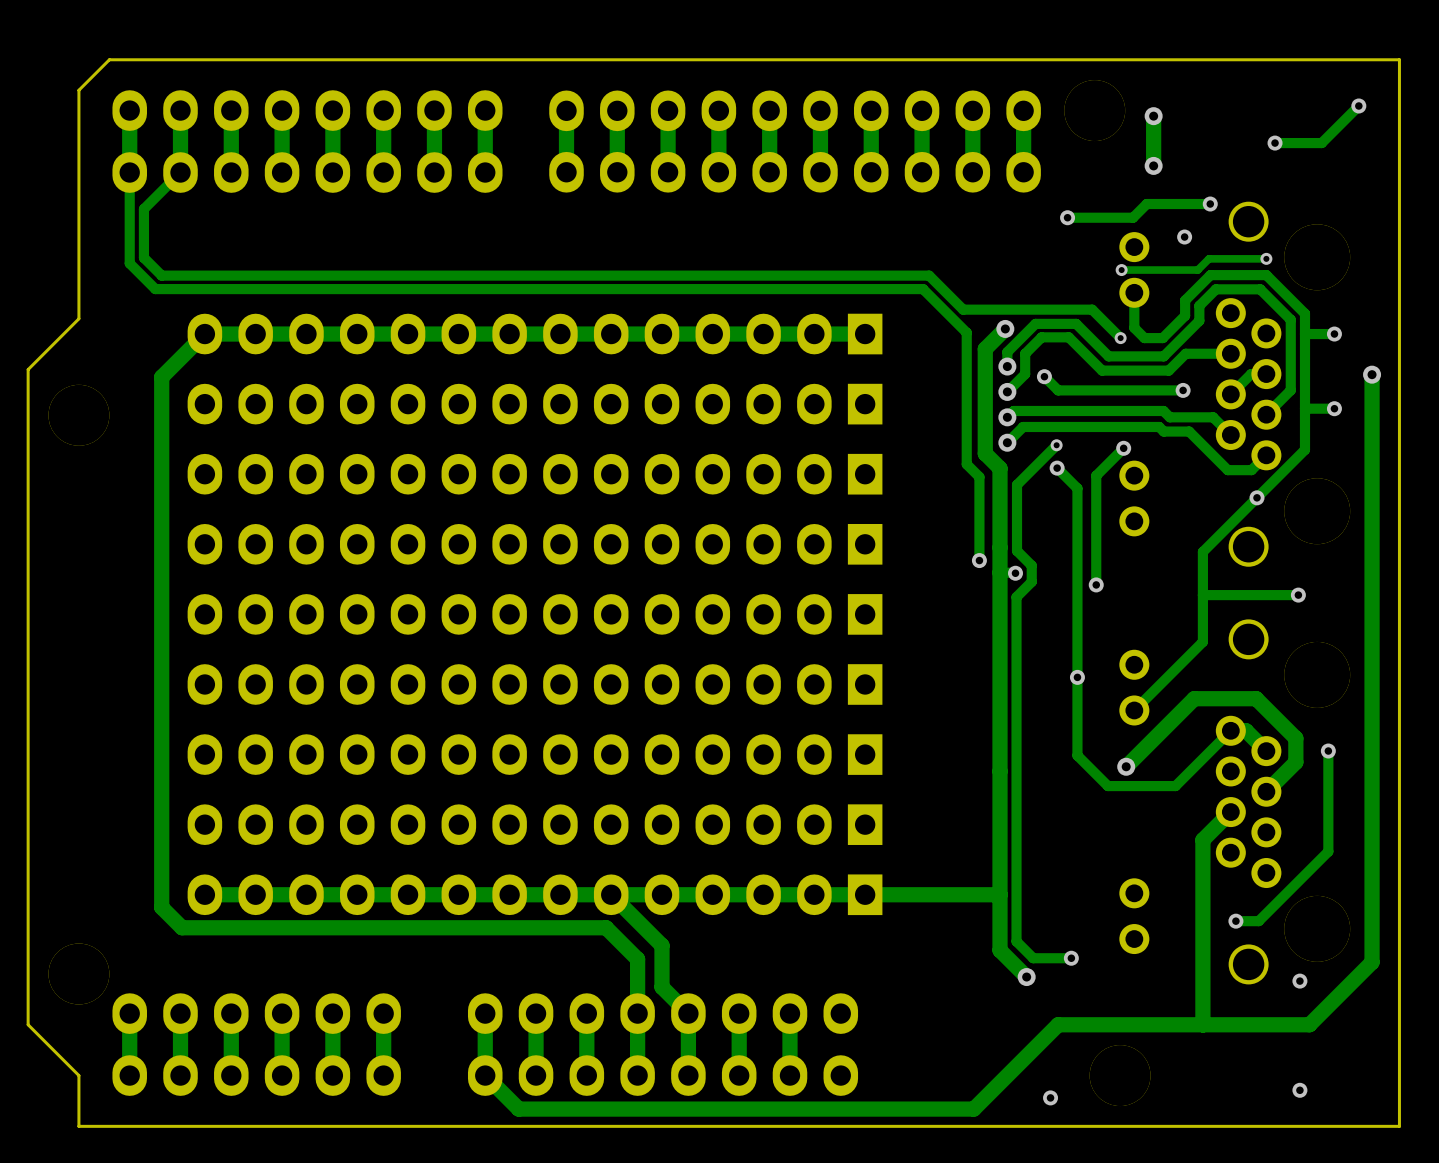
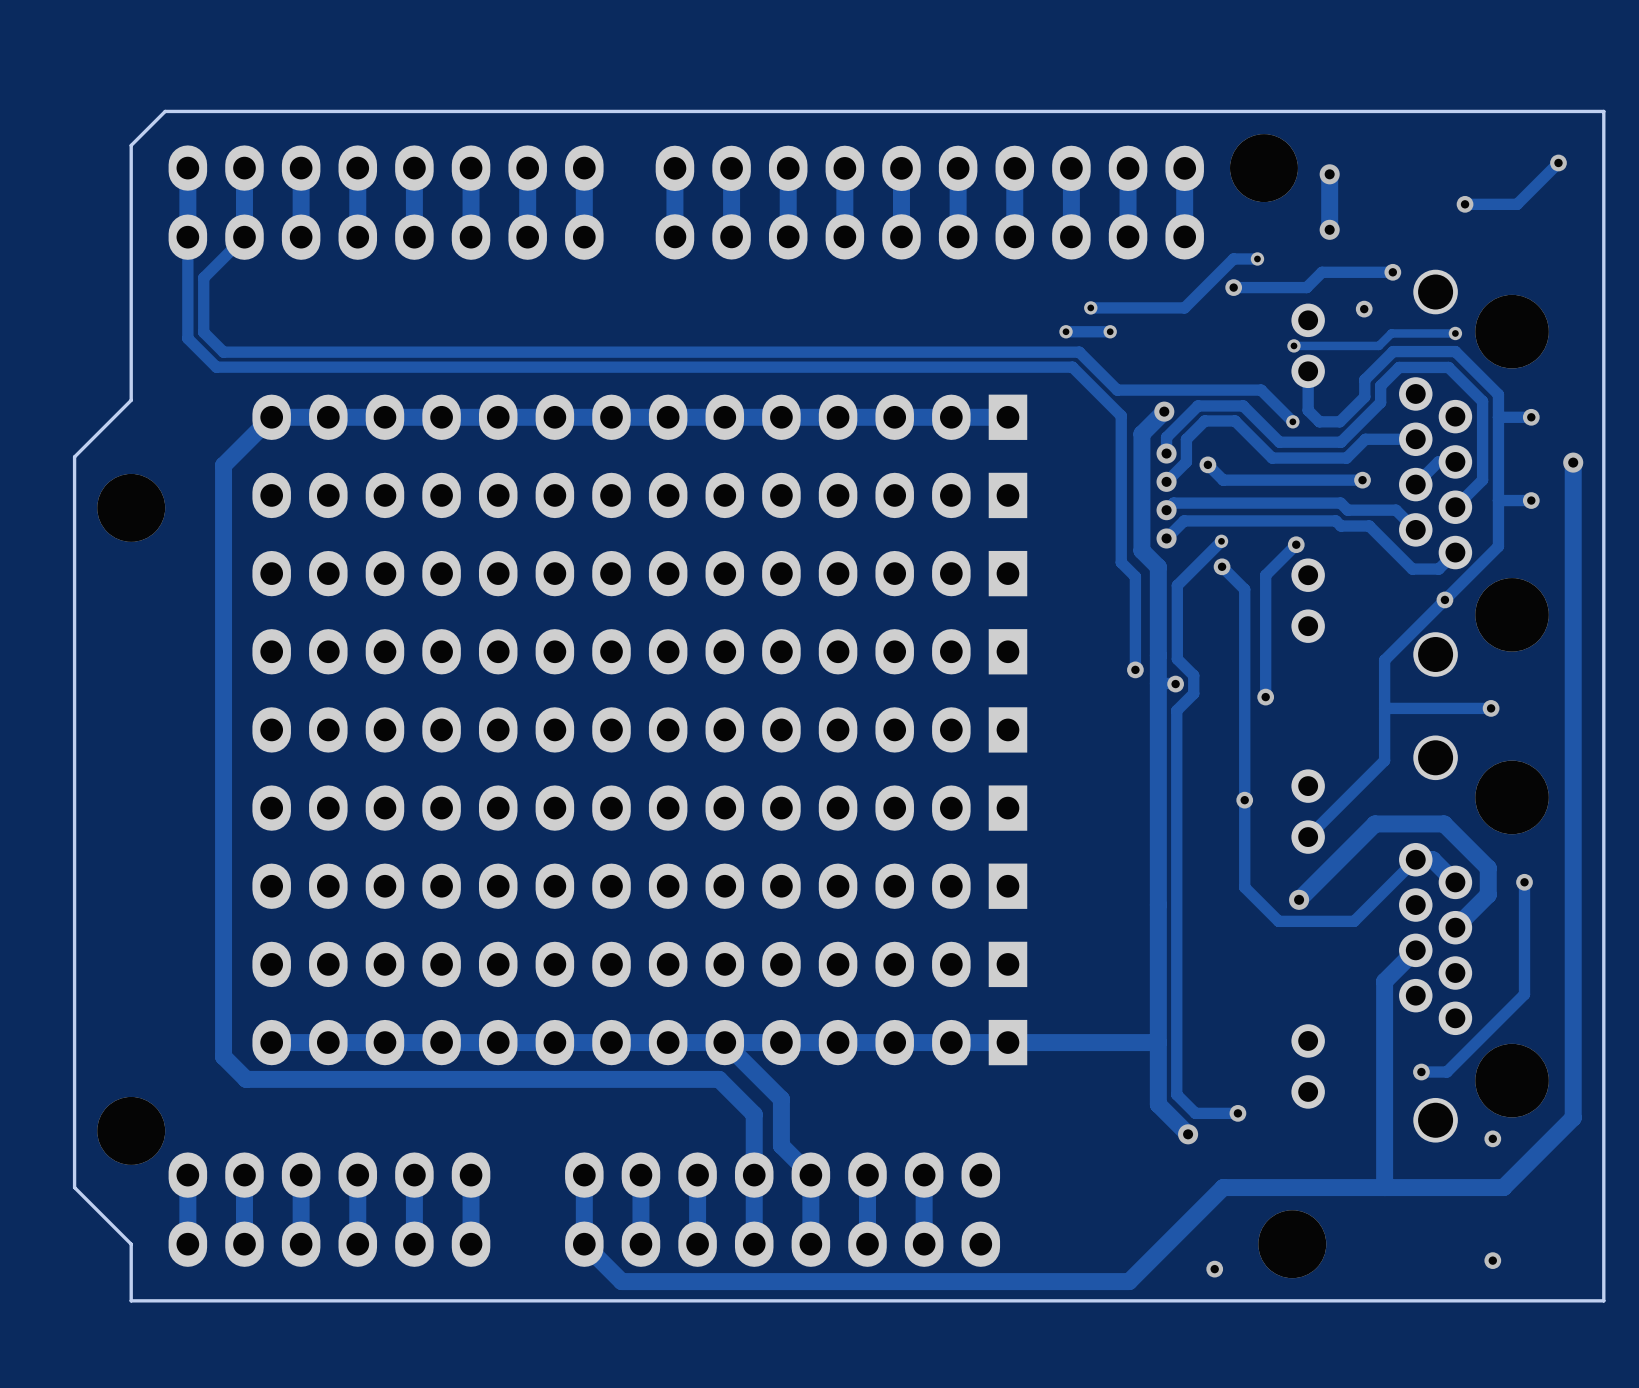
track: none -> (1257, 258) (1233, 258) (1184, 307) (1090, 307)
via: none -> (1257, 258)
via: none -> (1090, 307)
via: none -> (1066, 331)
track: none -> (1110, 331) (1066, 331)
via: none -> (1110, 331)

